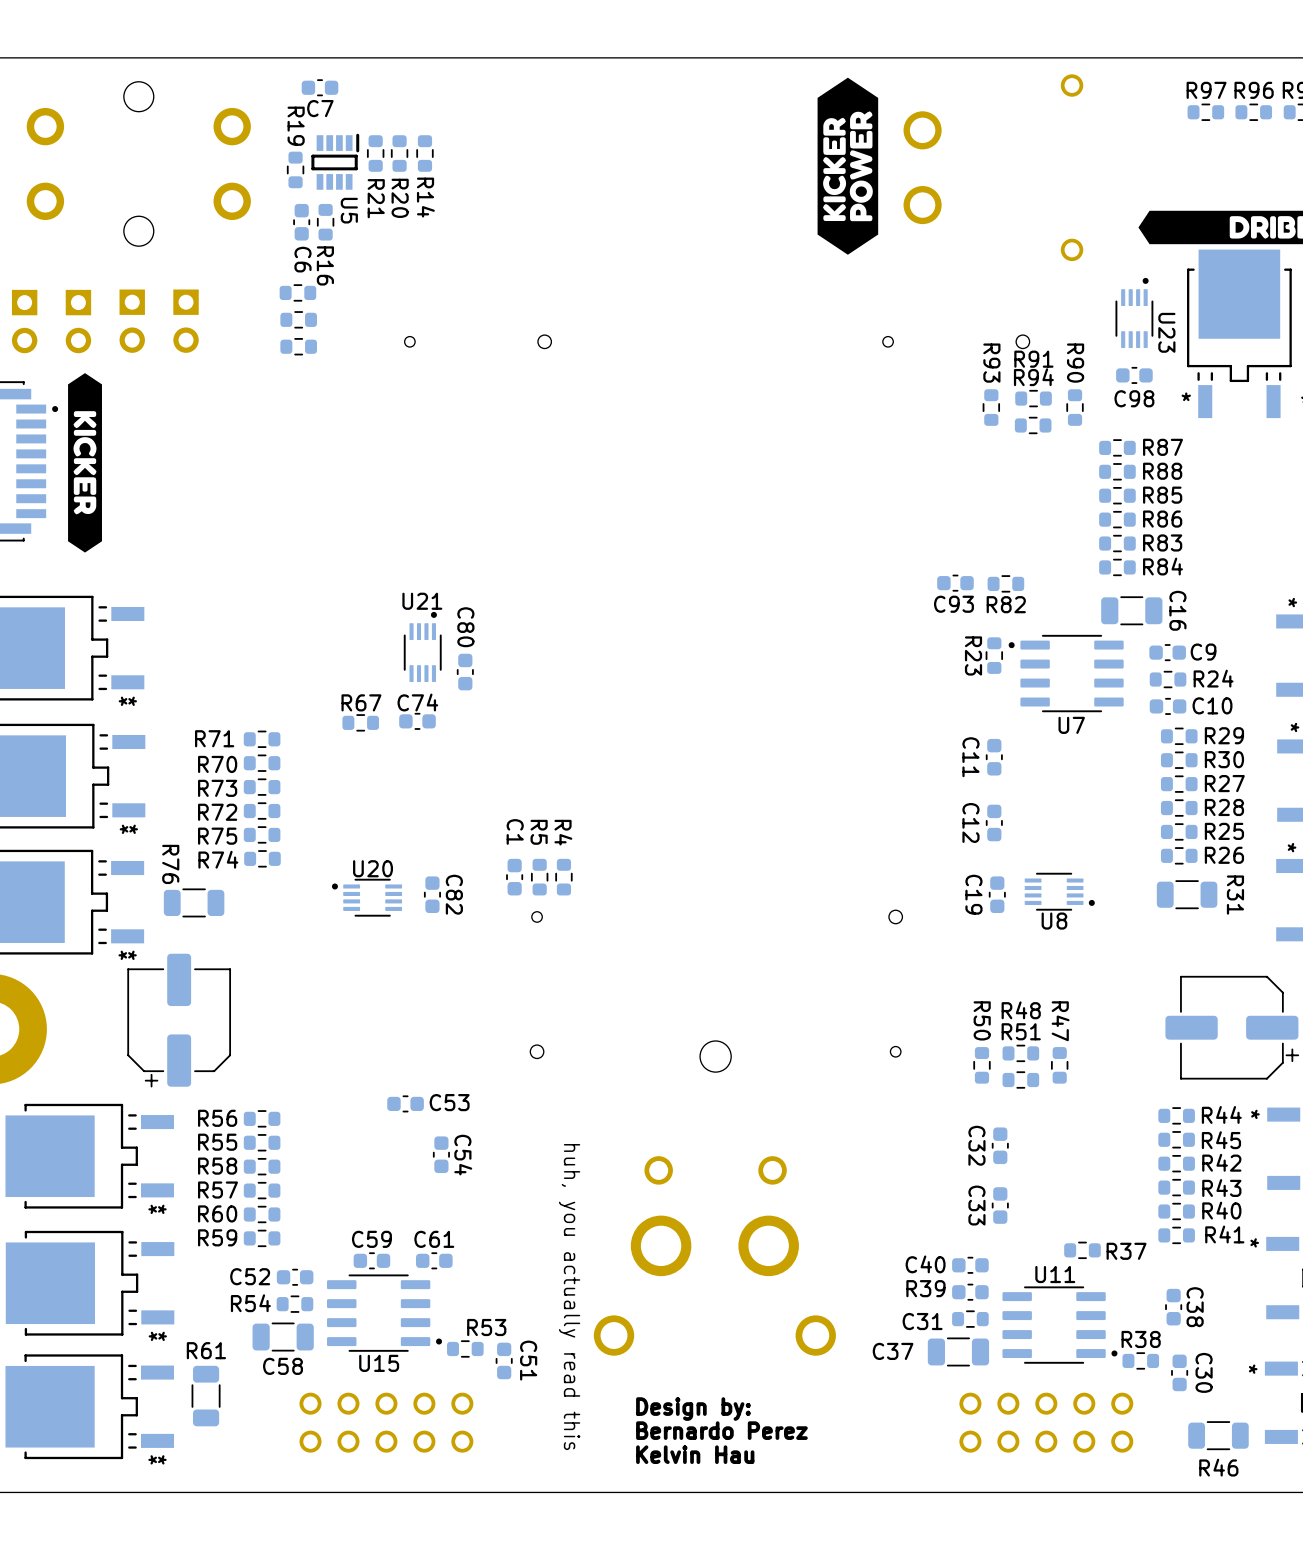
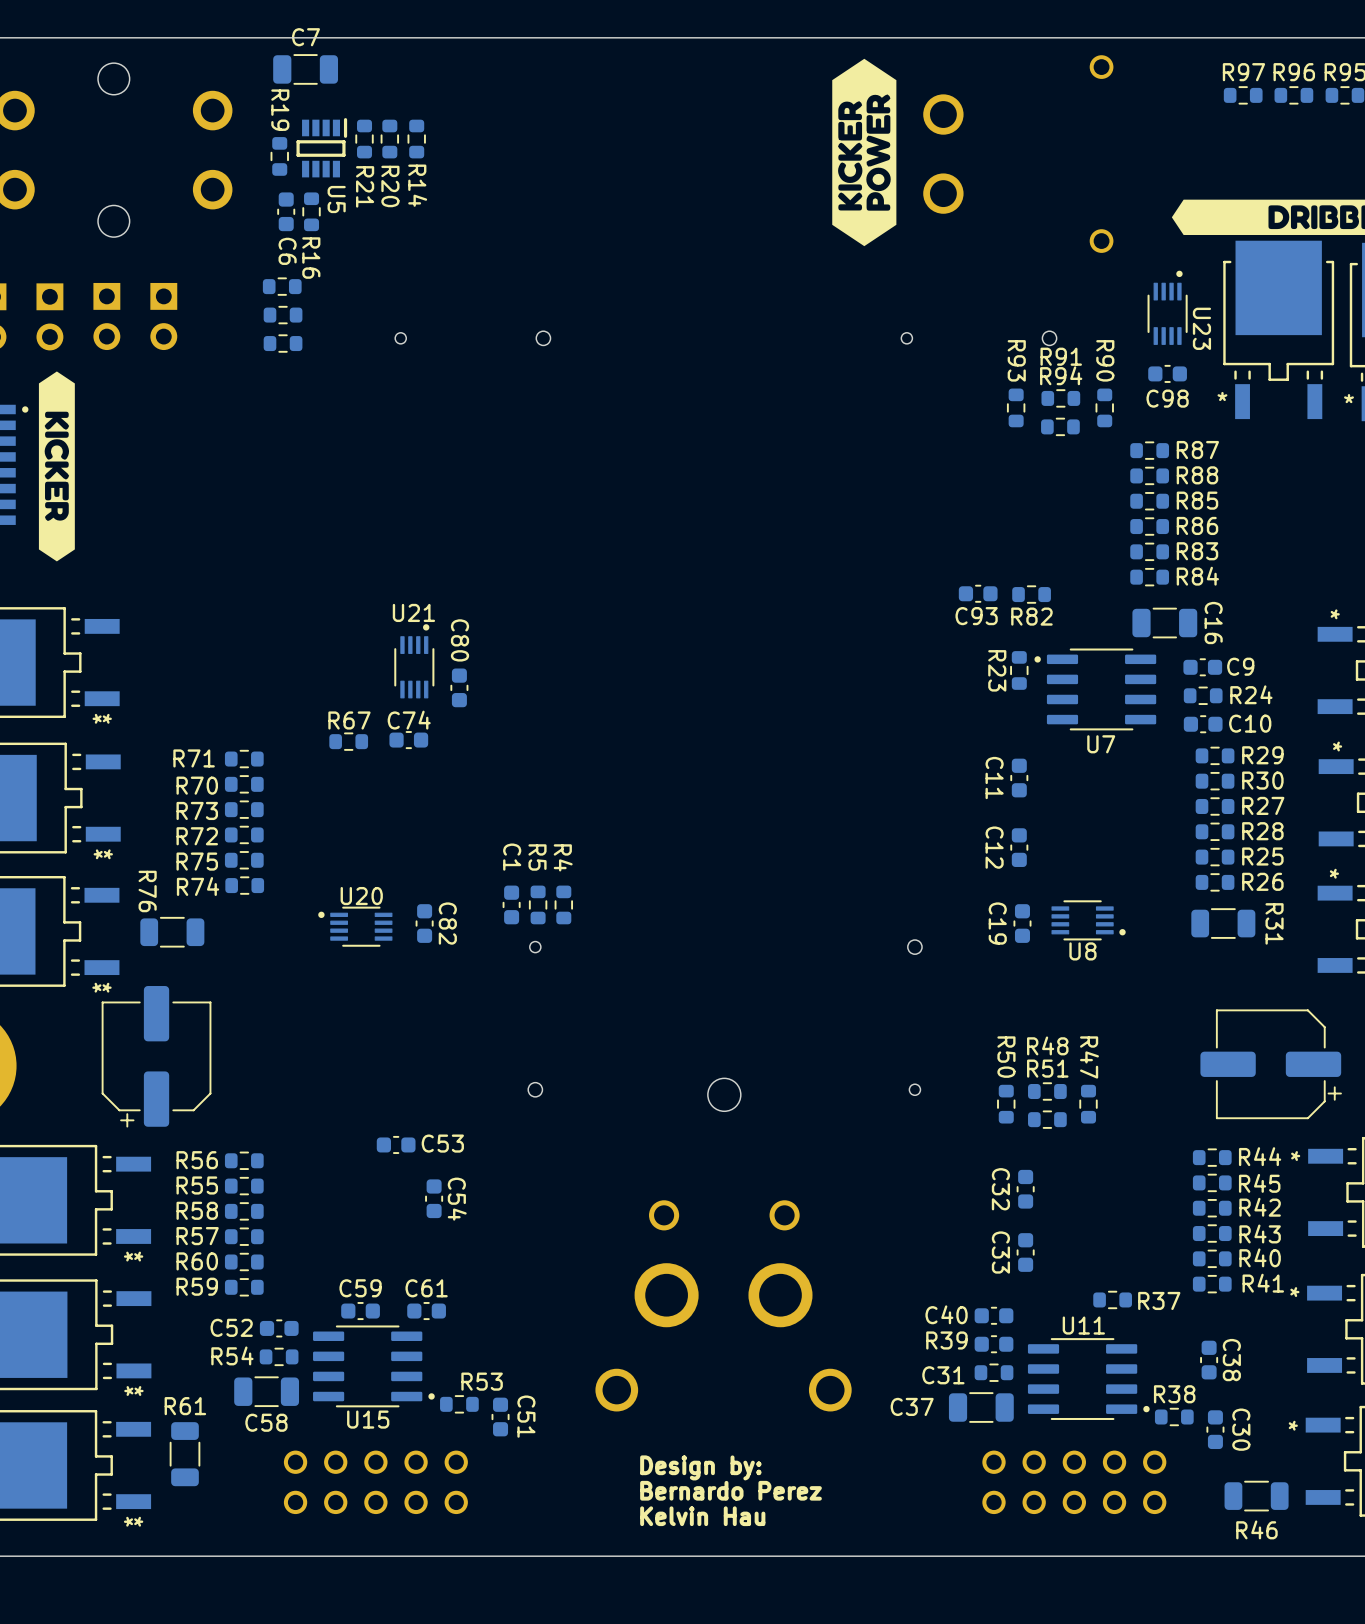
C7 footprint: [301, 79, 339, 97] -> [273, 54, 339, 85]
C7 name position: C7 (320, 108) -> C7 (305, 37)
text: huh, you actually read this (569, 1297) -> none

